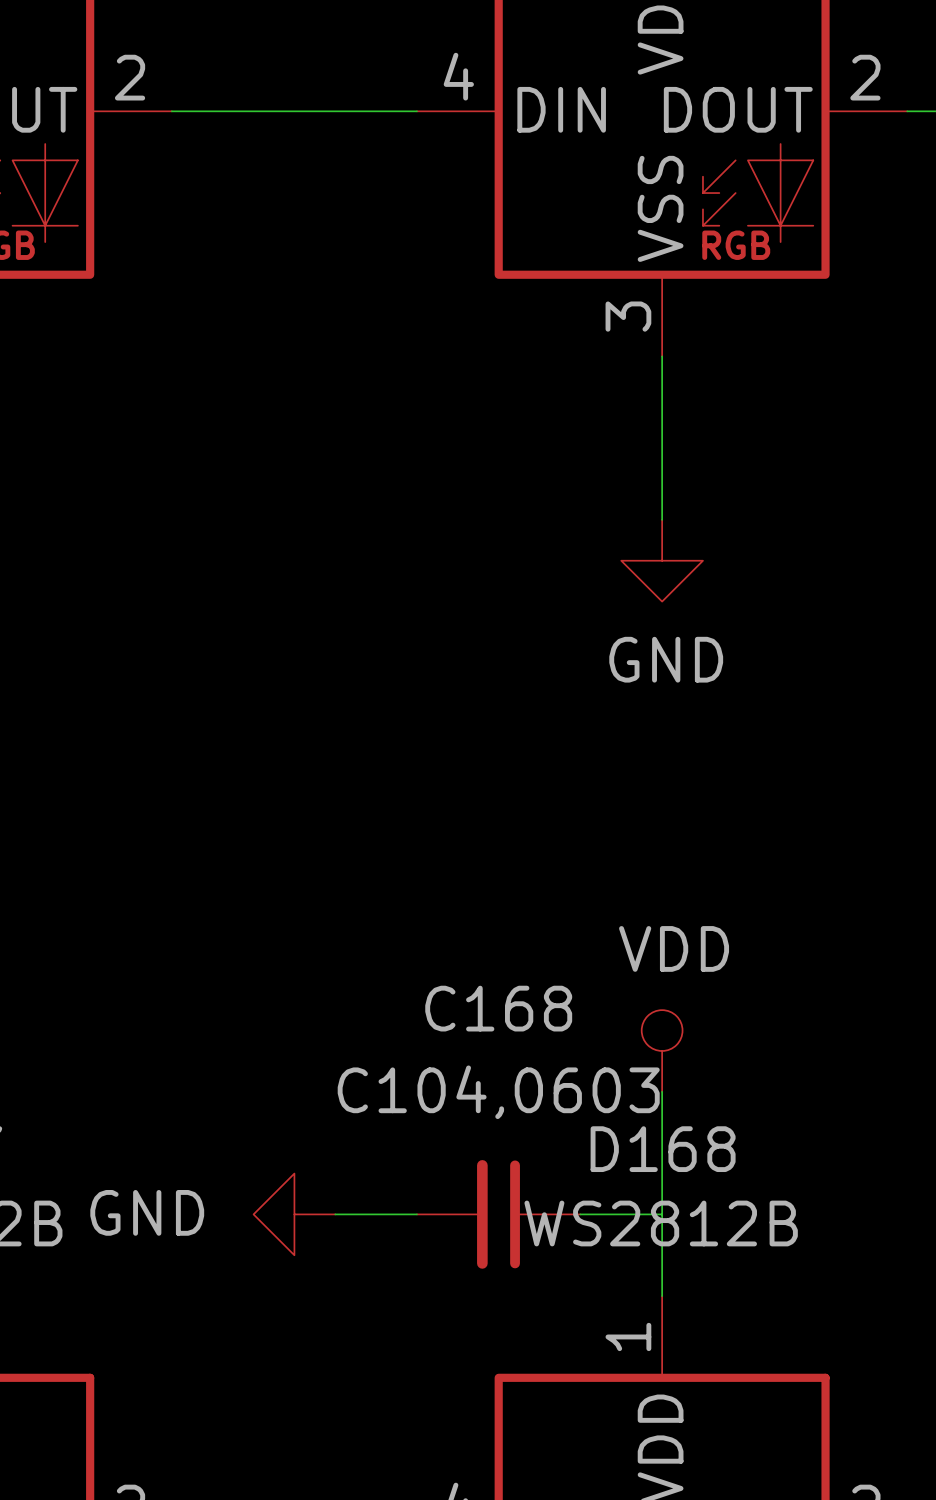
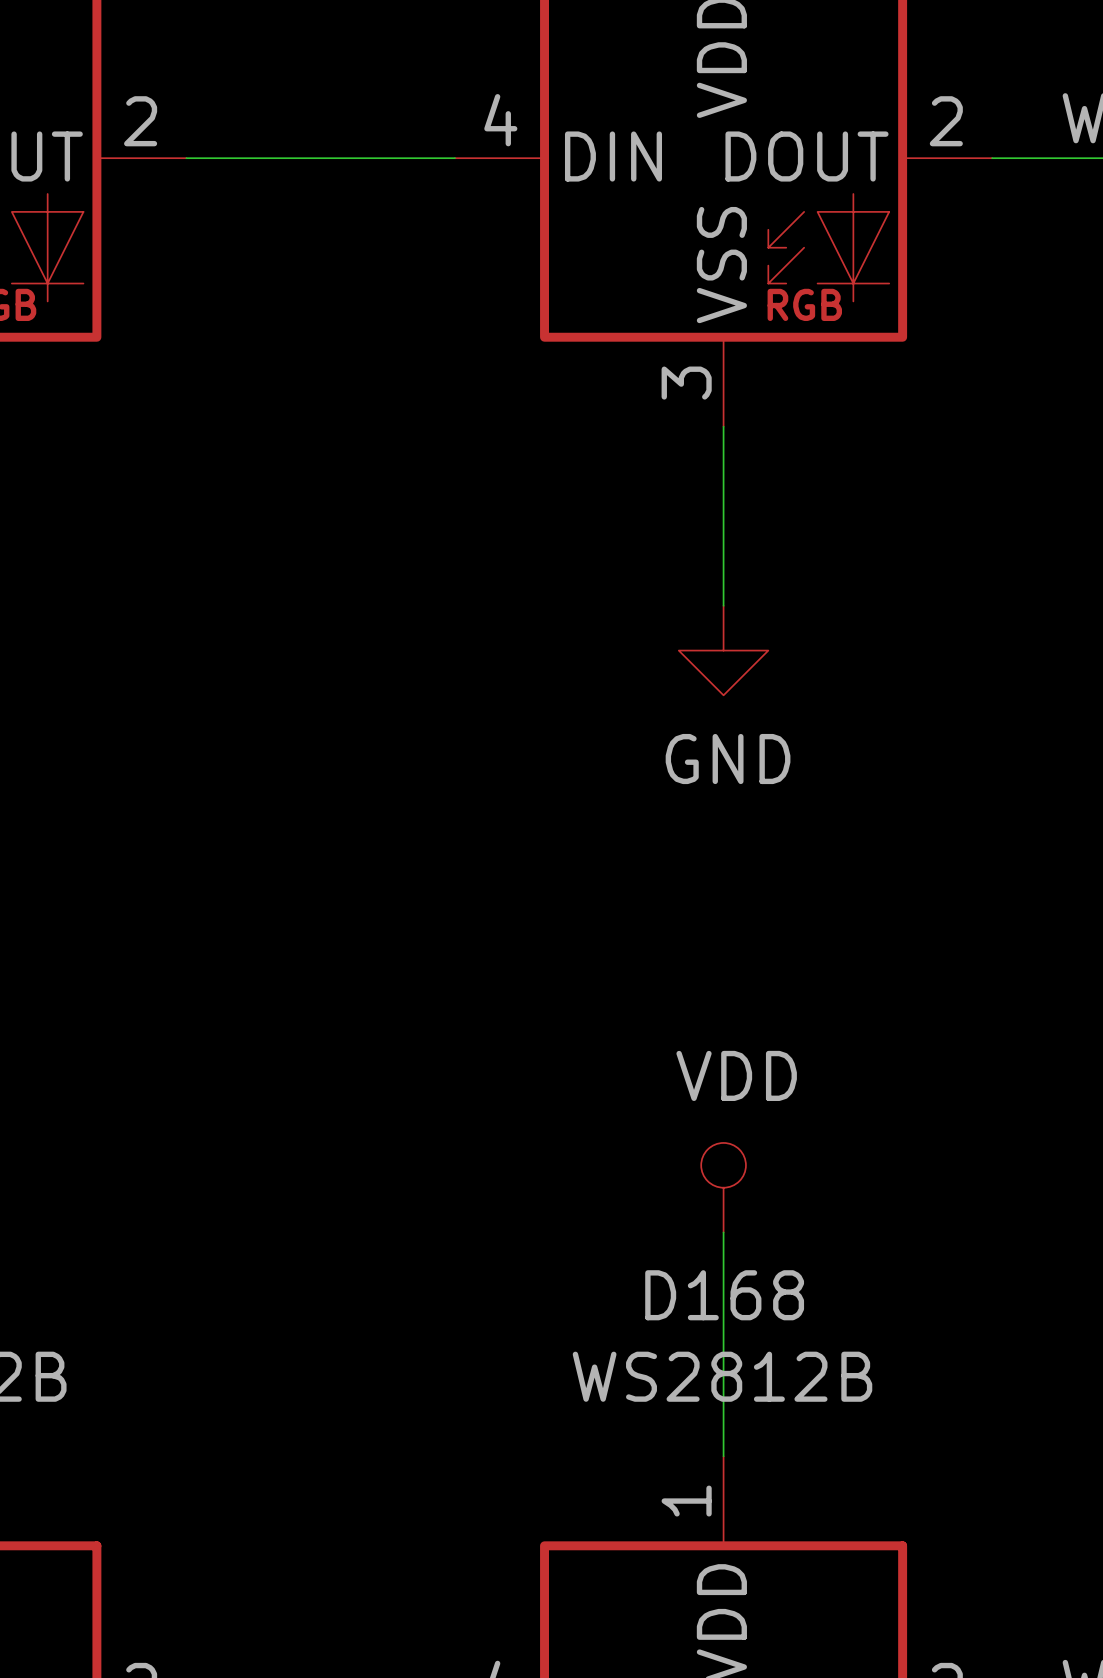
power symbol: GND (294, 1214) -> none
wire: (335, 1214) (416, 1214) -> none
C168: C104,0603 (498, 1214) -> none
wire: (580, 1214) (662, 1214) -> none

